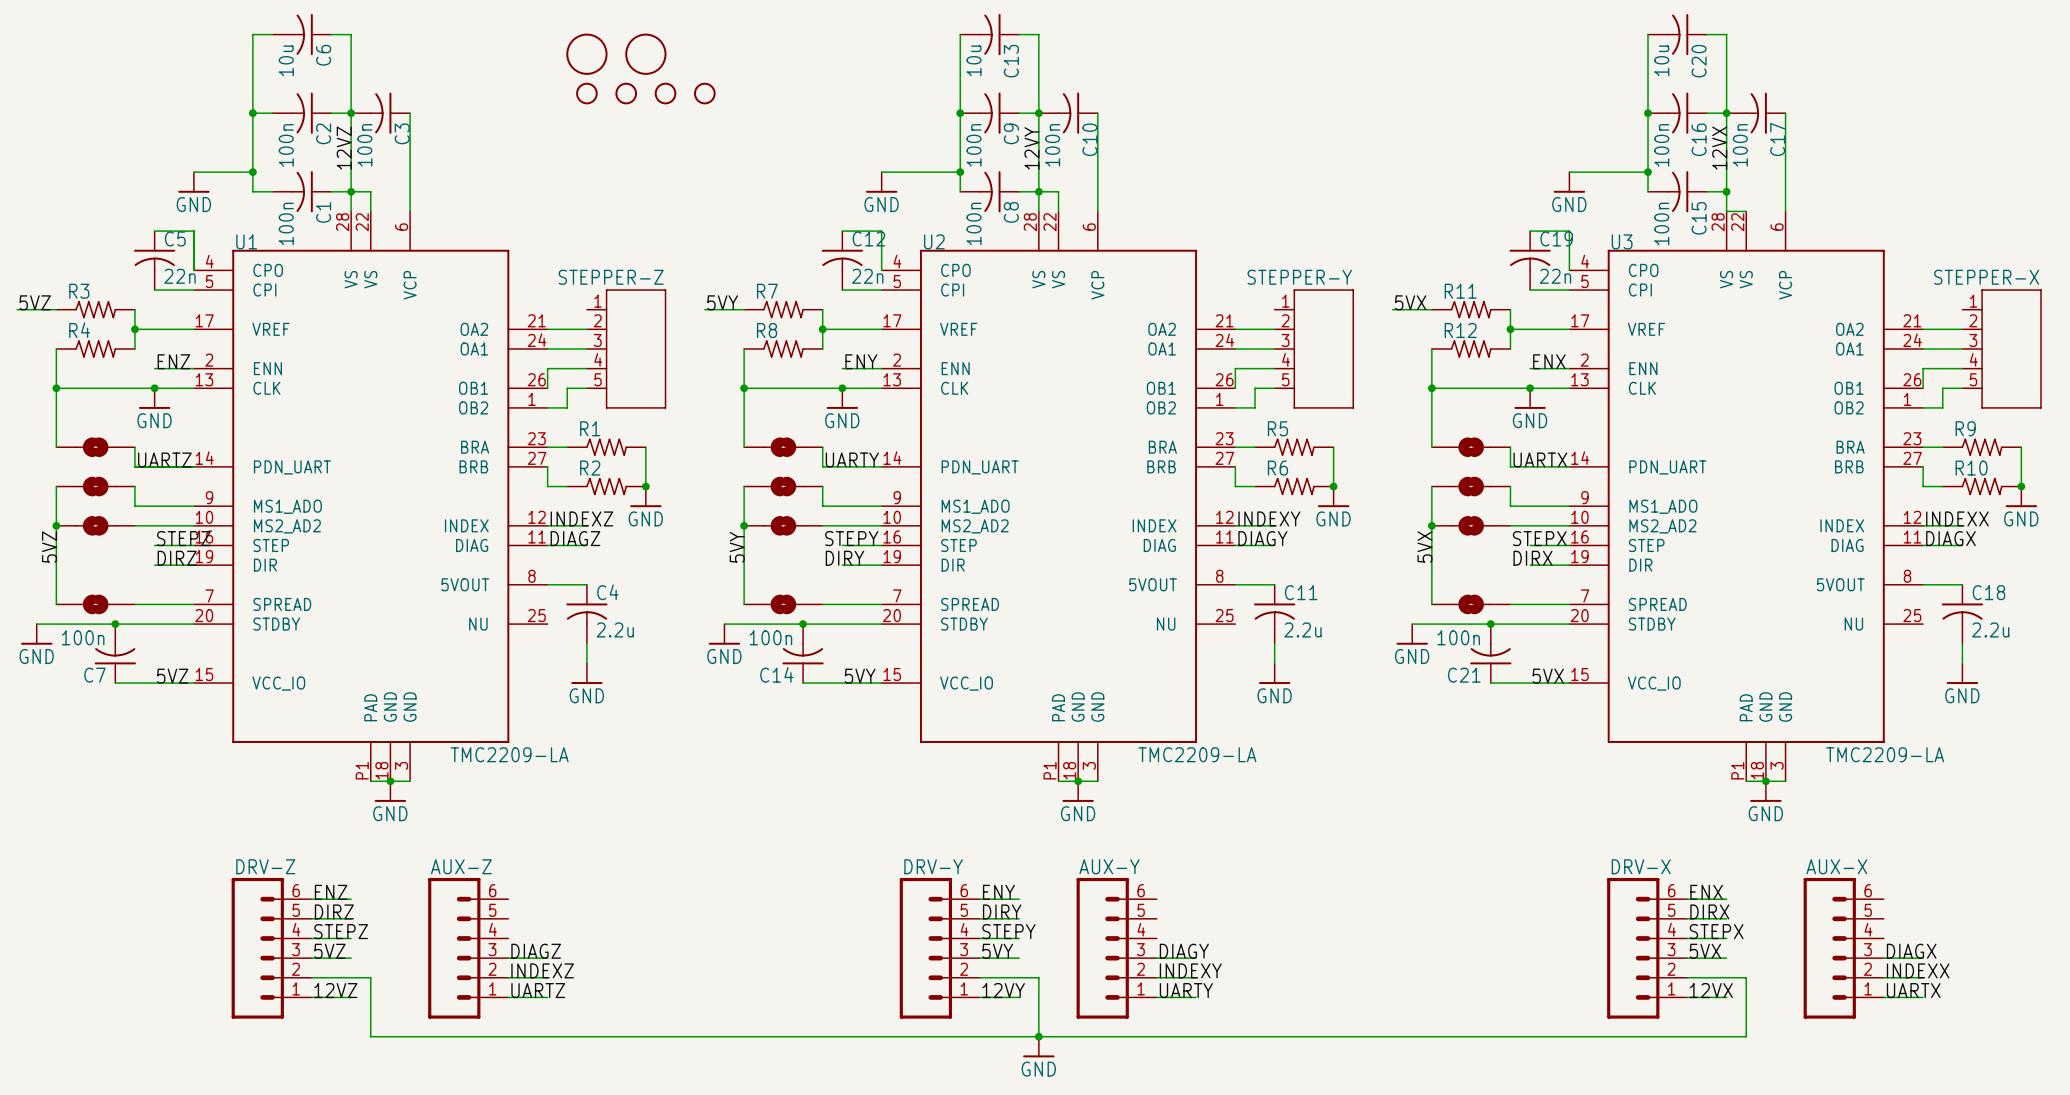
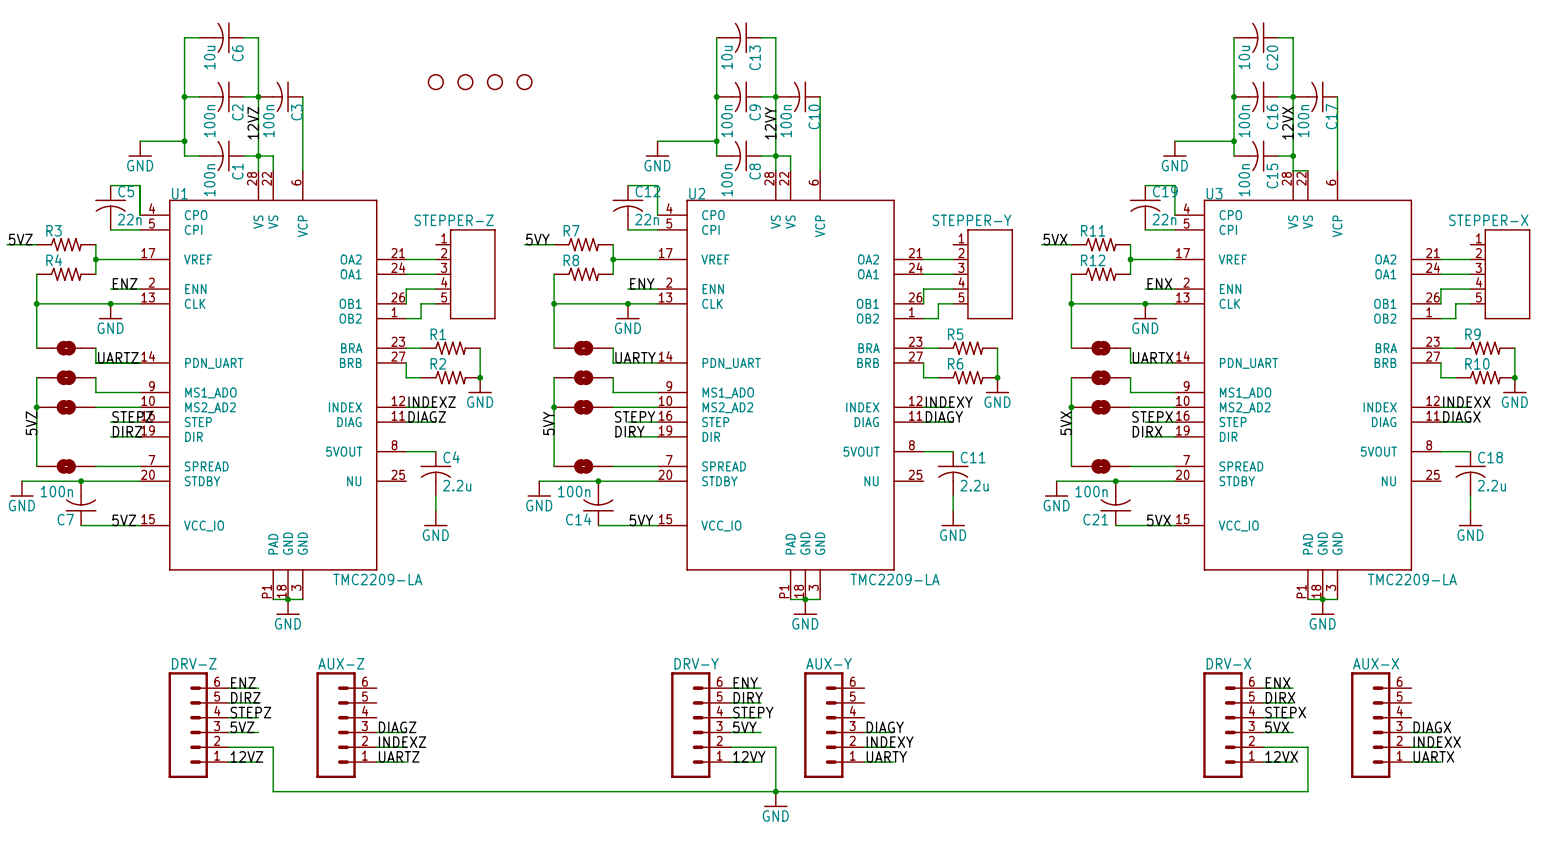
part: (586, 54) -> none
part: (645, 54) -> none

